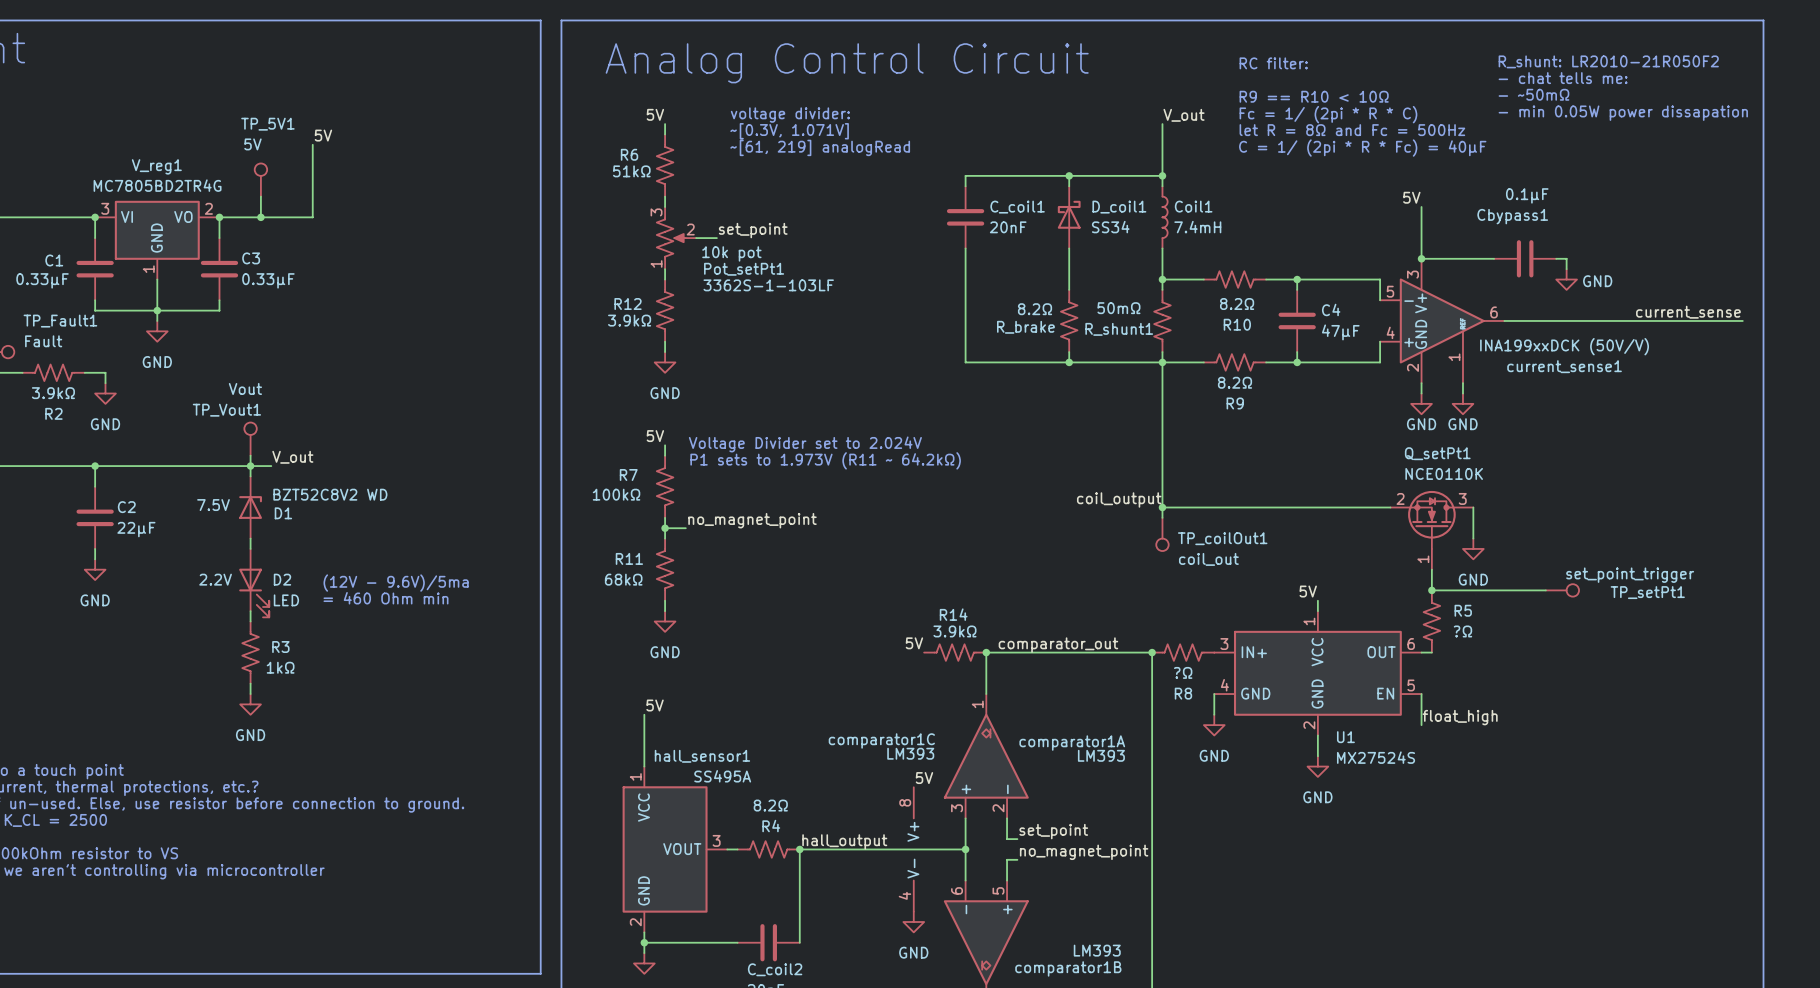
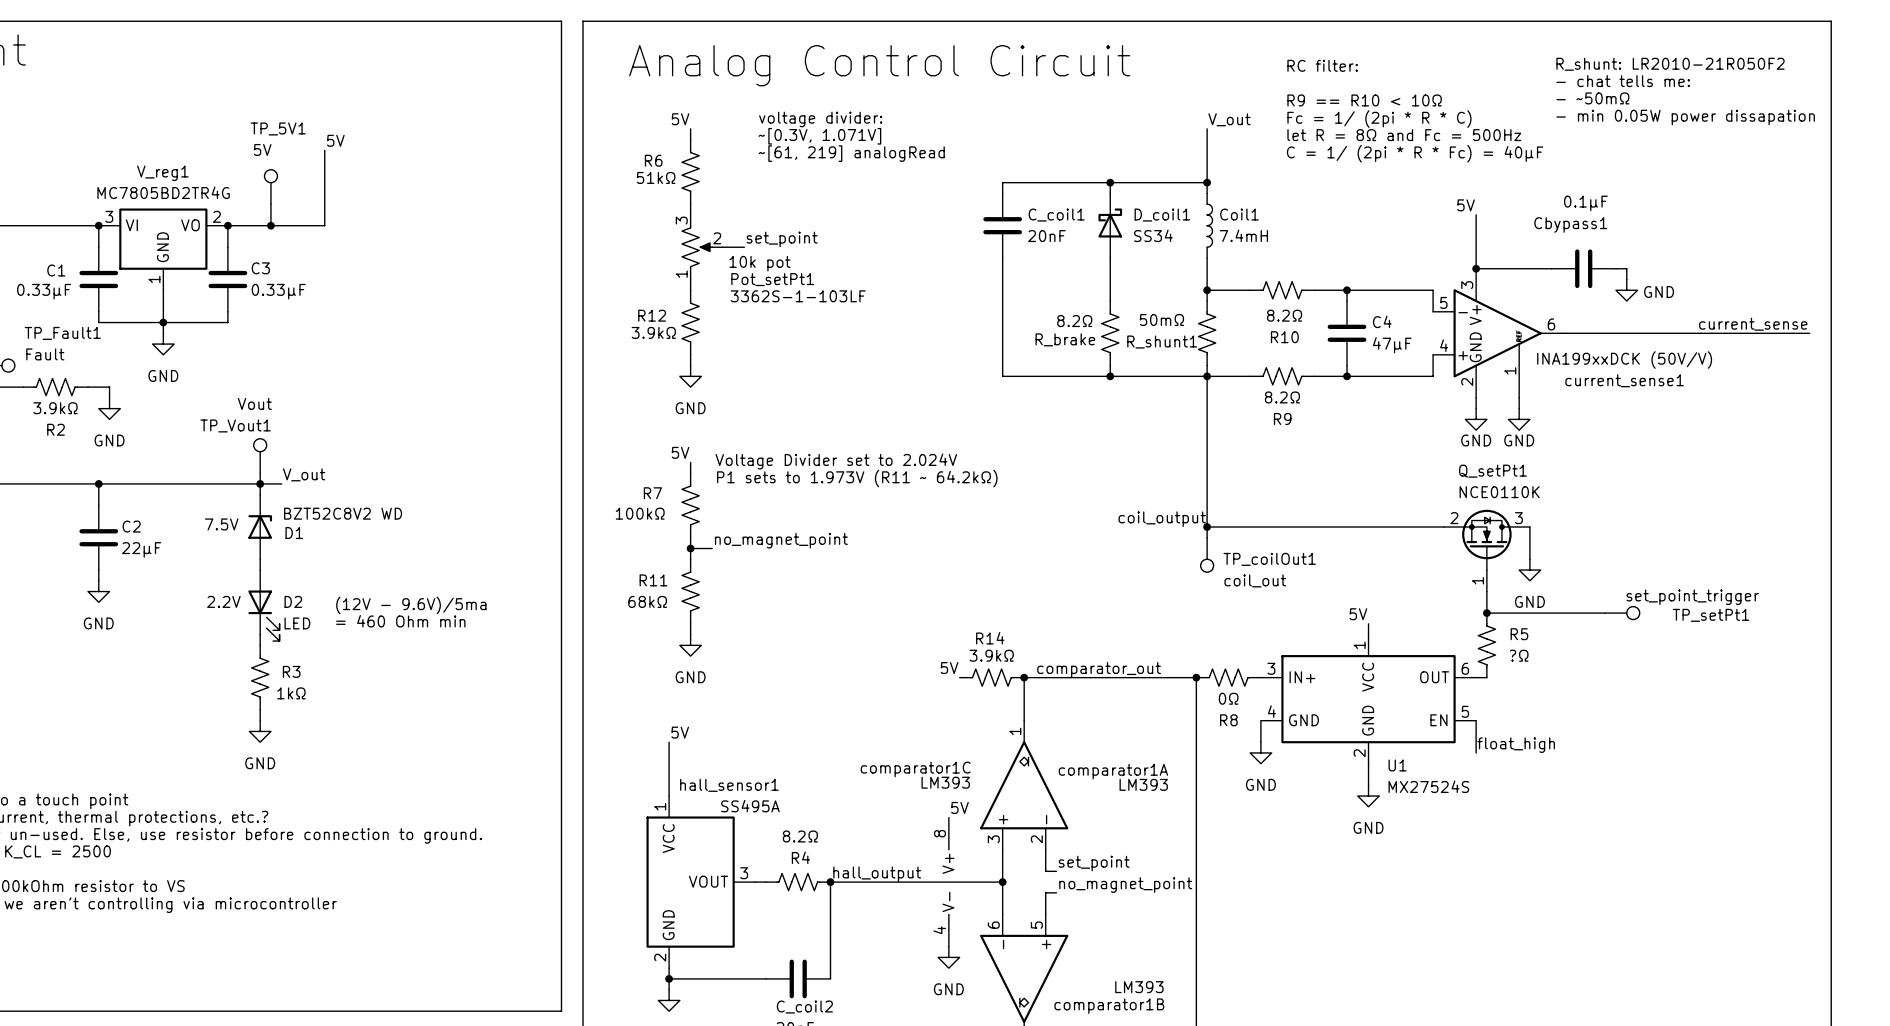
R8 value: ?Ω (1183, 672) -> 0Ω (1228, 698)

